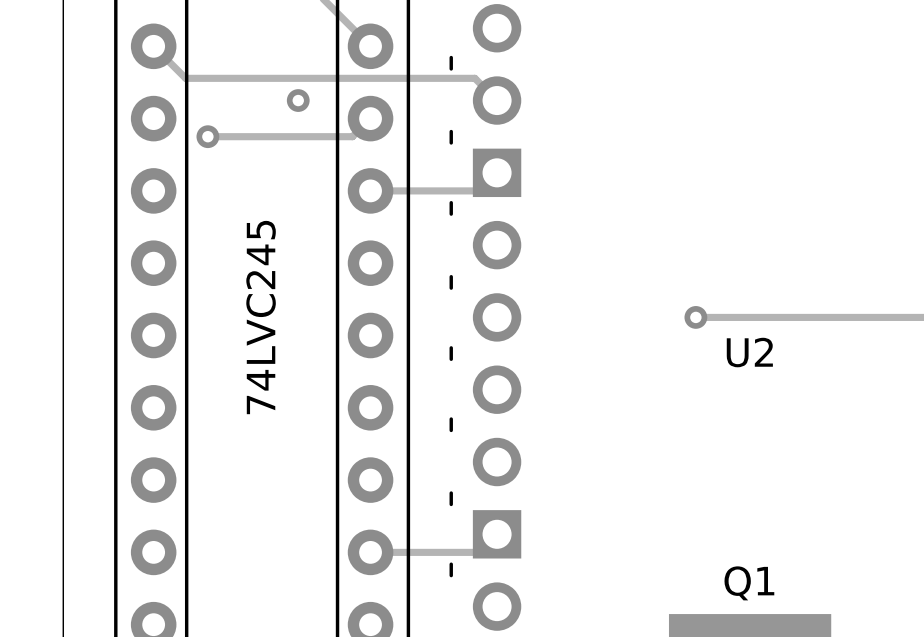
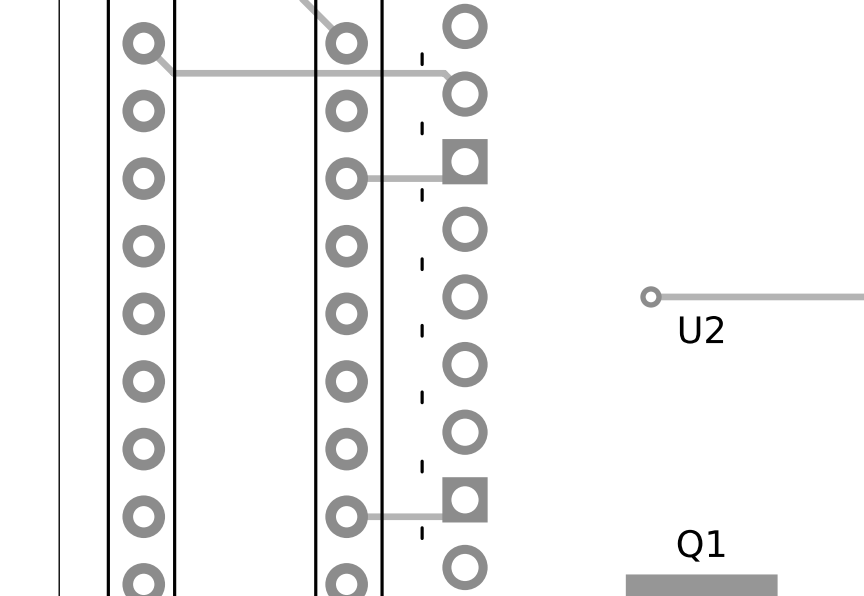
via: (298, 100) -> none
track: (370, 118) (352, 136) (207, 136) -> none
via: (207, 136) -> none
part value: 74LVC245 (261, 317) -> none

